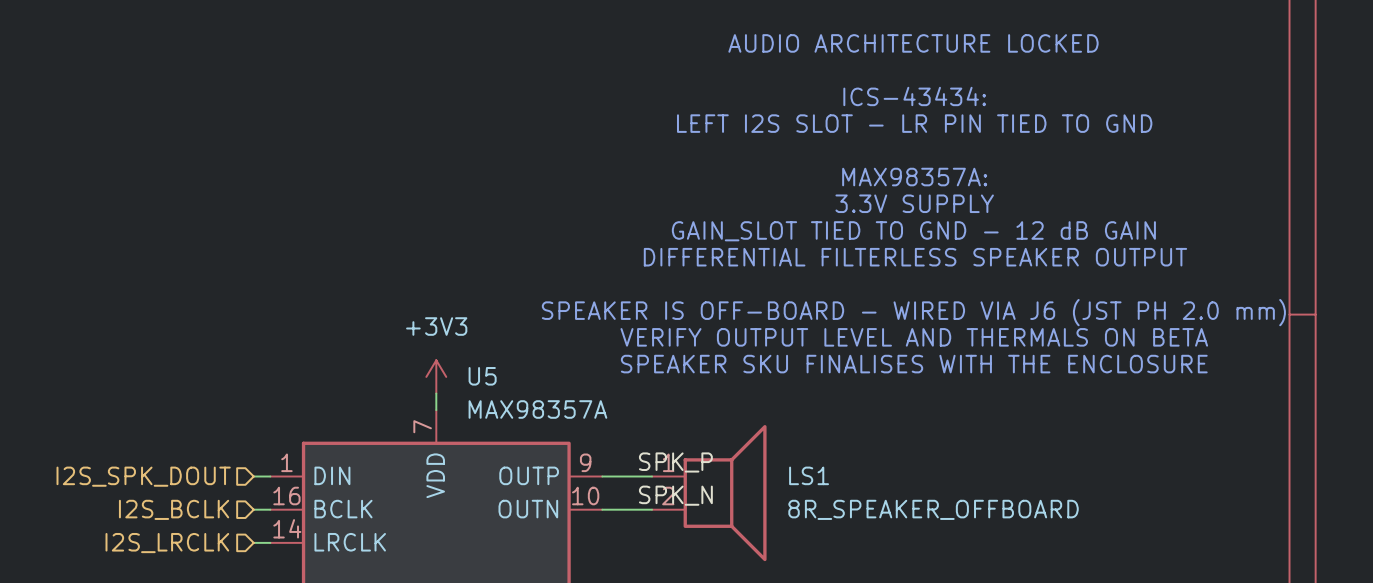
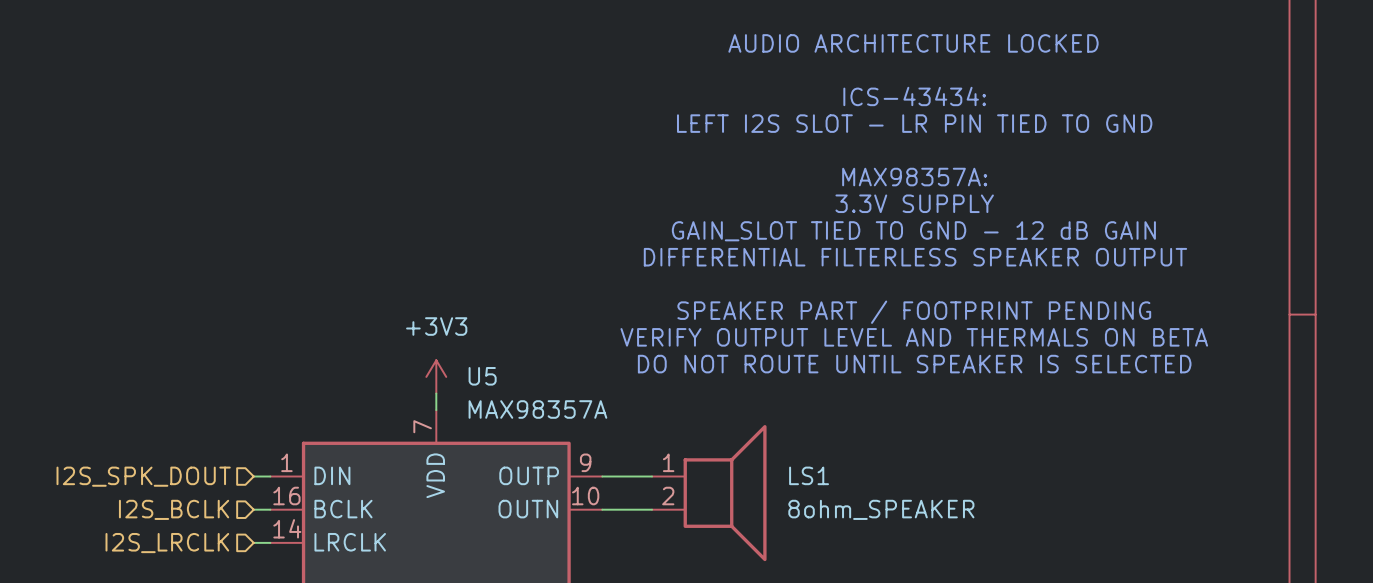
text: SPEAKER IS OFF-BOARD - WIRED VIA J6 (JST PH 2.0 mm) (913, 312) -> SPEAKER PART / FOOTPRINT PENDING (914, 312)
text: SPEAKER SKU FINALISES WITH THE ENCLOSURE (914, 364) -> DO NOT ROUTE UNTIL SPEAKER IS SELECTED (914, 364)
label: SPK_P (675, 462) -> none
label: SPK_N (675, 495) -> none
LS1 value: 8R_SPEAKER_OFFBOARD (933, 509) -> 8ohm_SPEAKER (881, 509)

